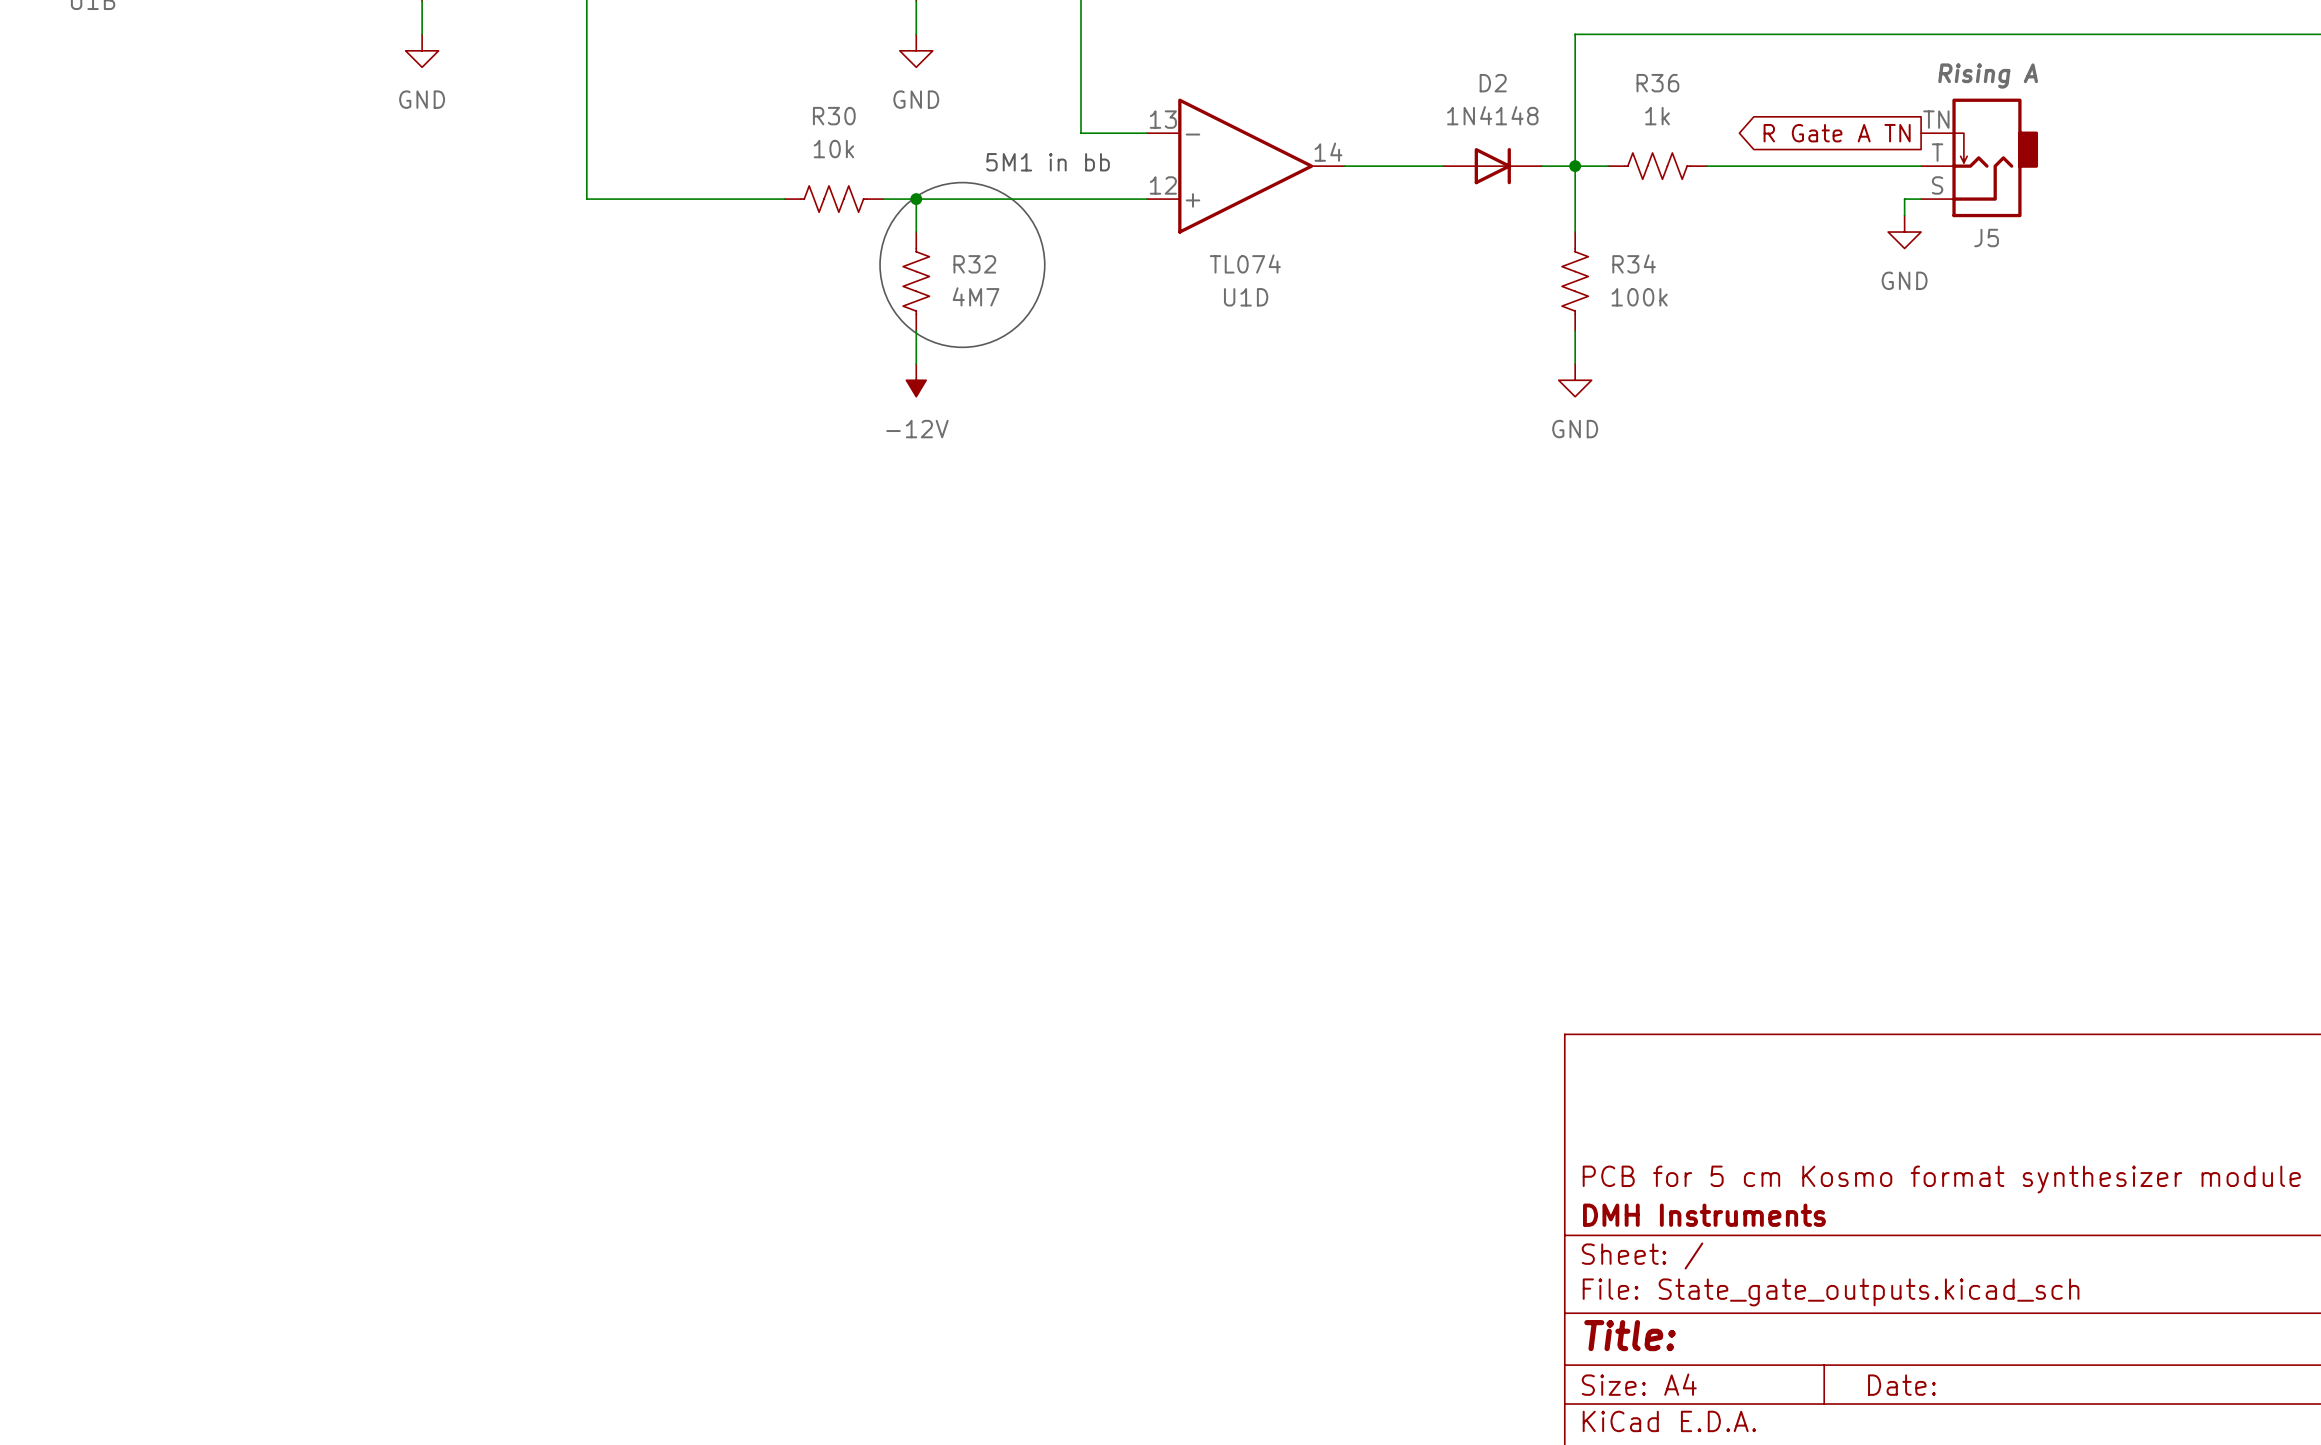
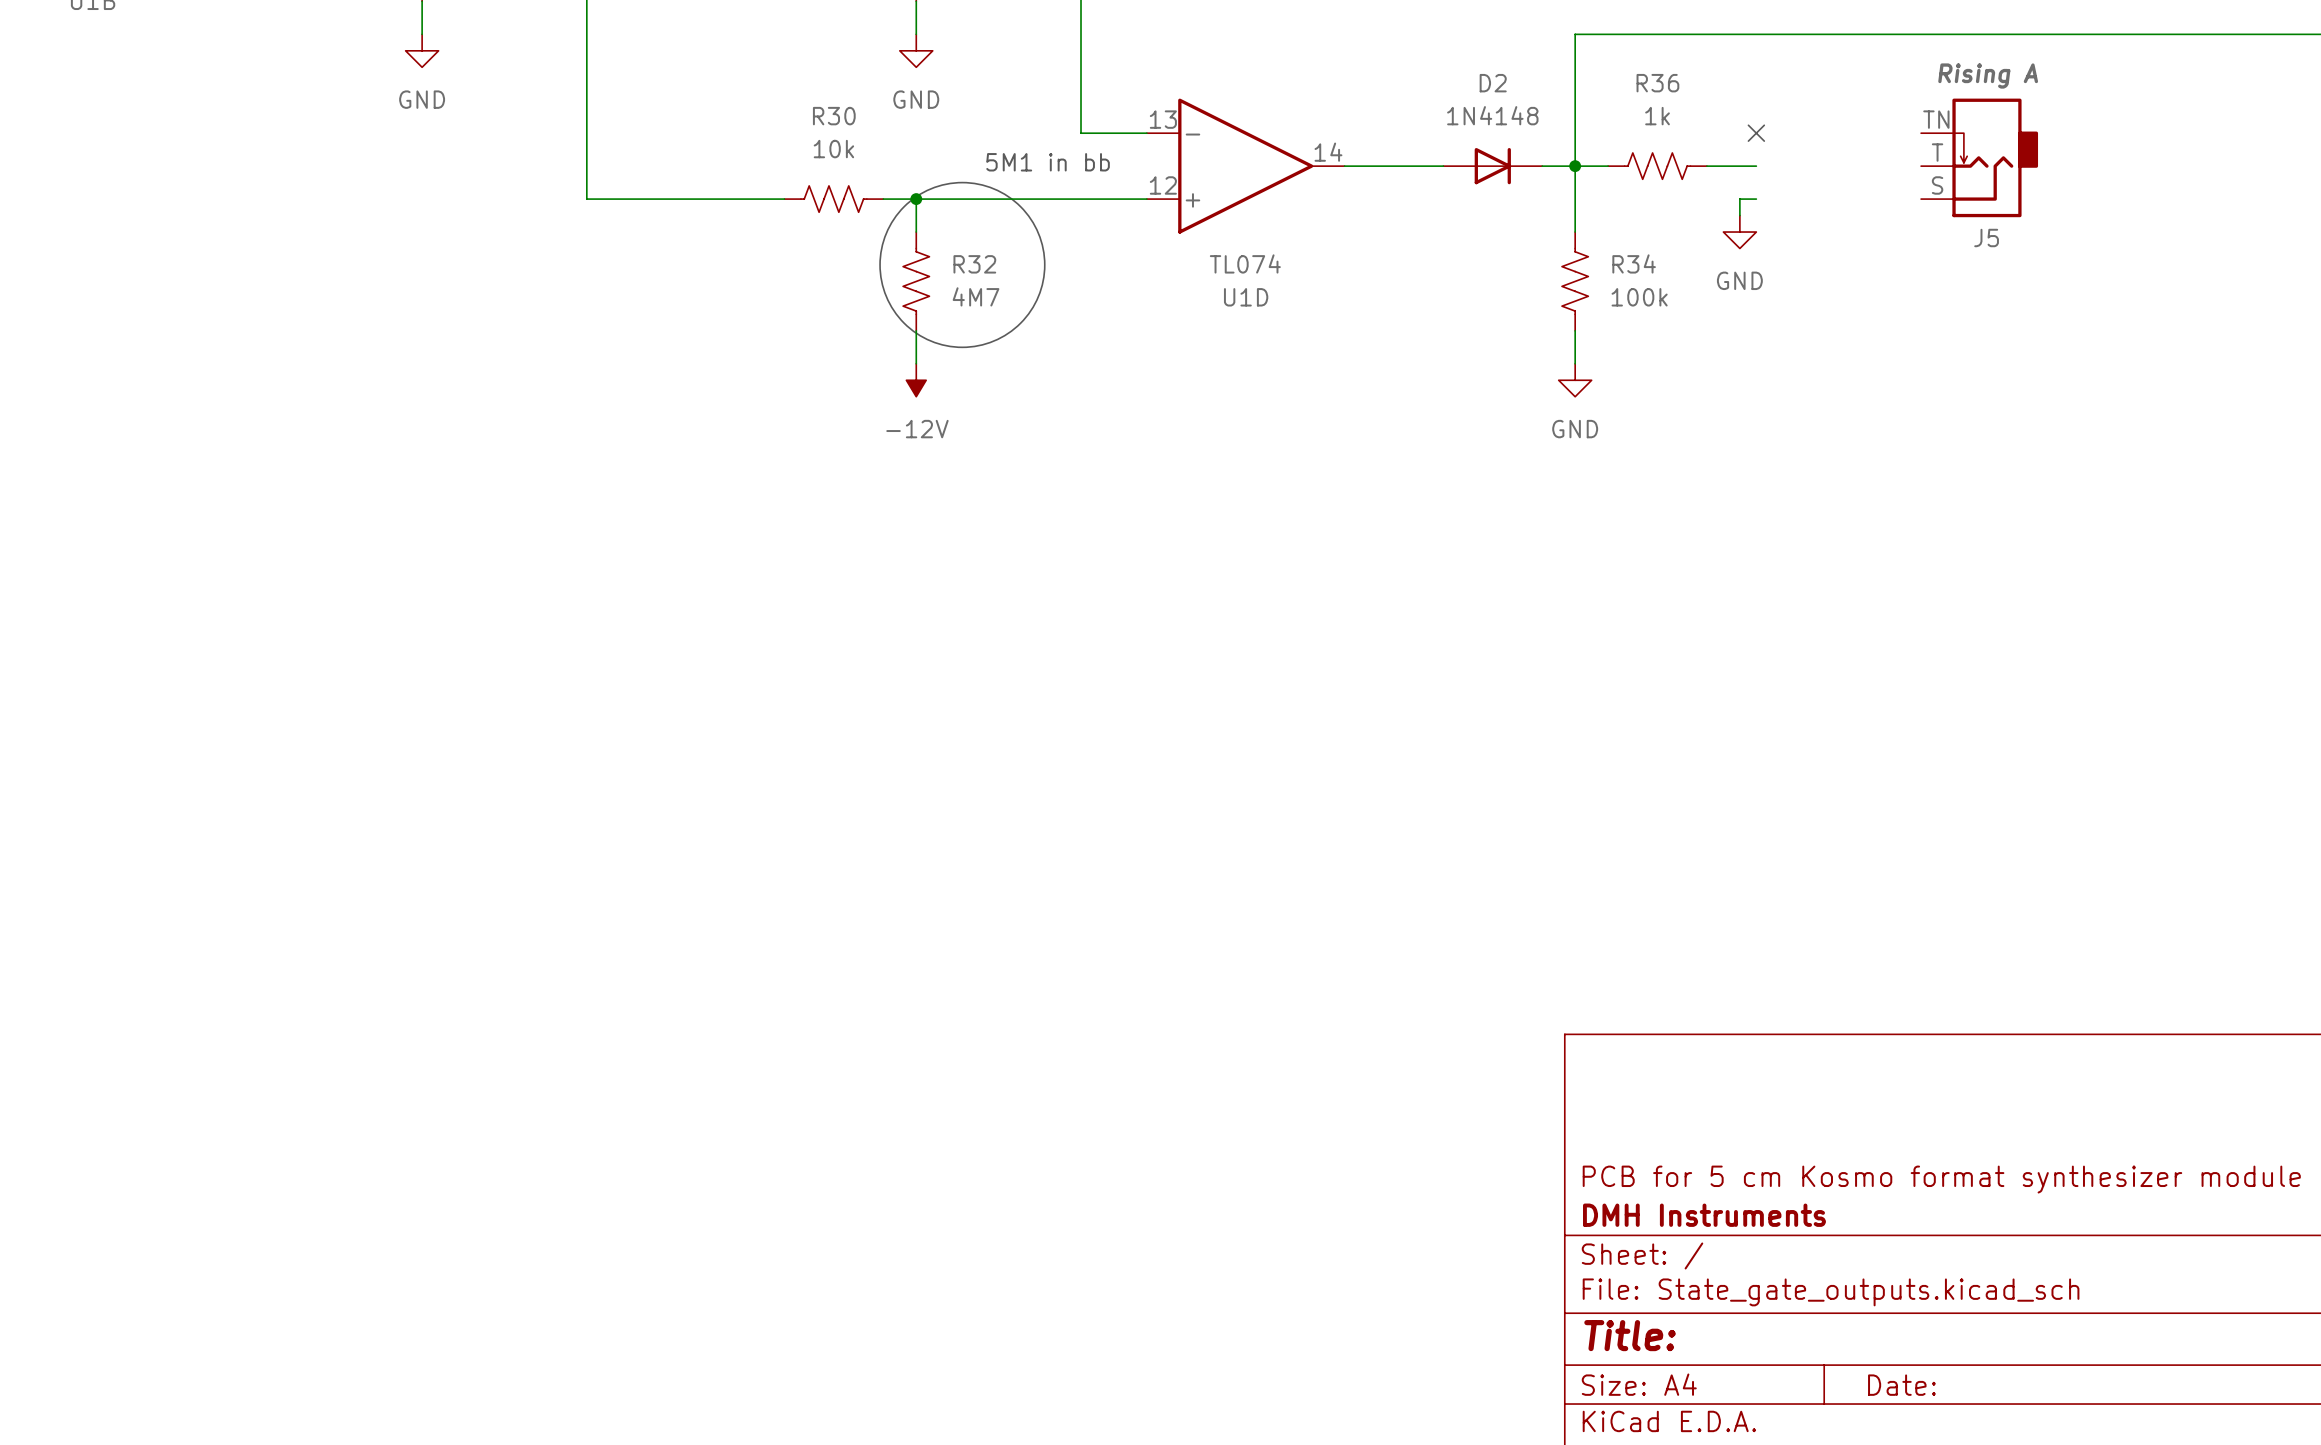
no-connect mark: none -> (1756, 133)
global label: R Gate A TN (1837, 133) -> none
wire: (1756, 166) (1921, 166) -> none
wire: (1921, 199) (1904, 199) (1904, 215) -> (1756, 199) (1739, 199) (1739, 215)
power symbol position: GND (1904, 232) -> GND (1739, 232)

